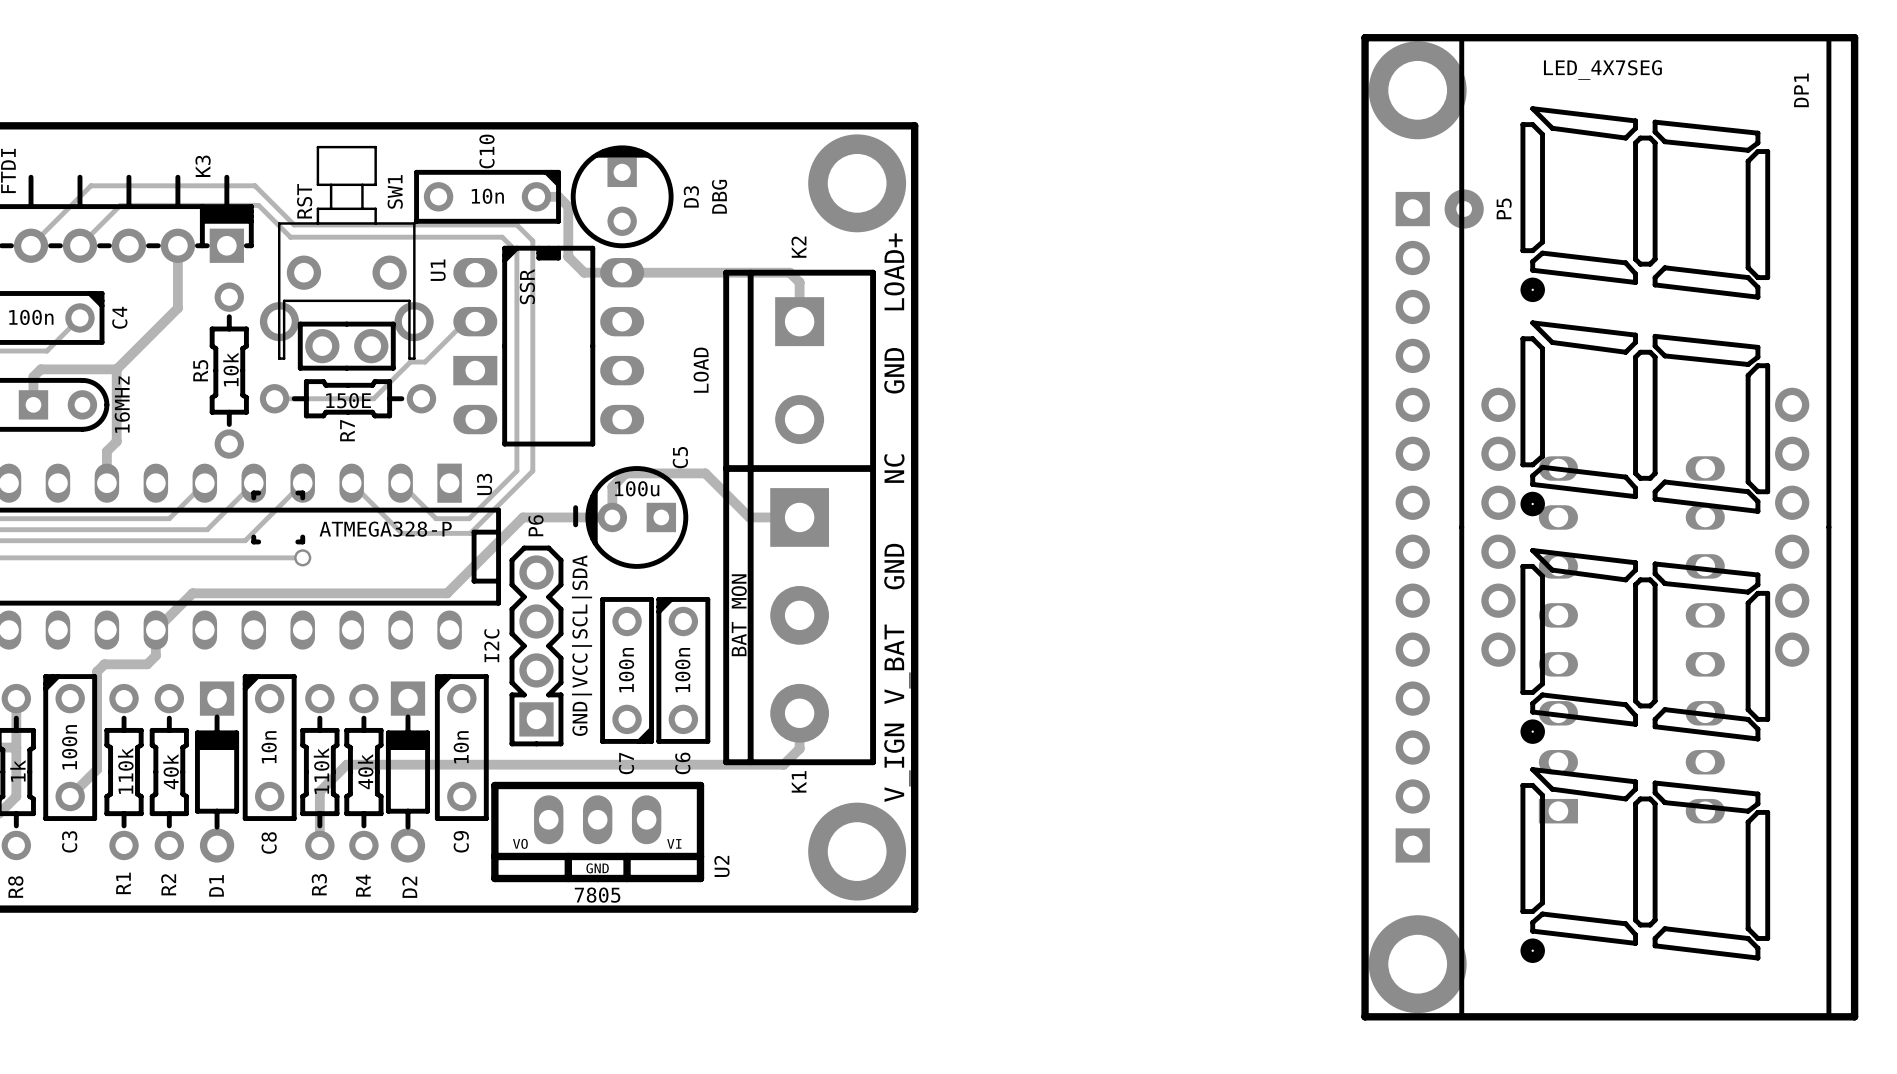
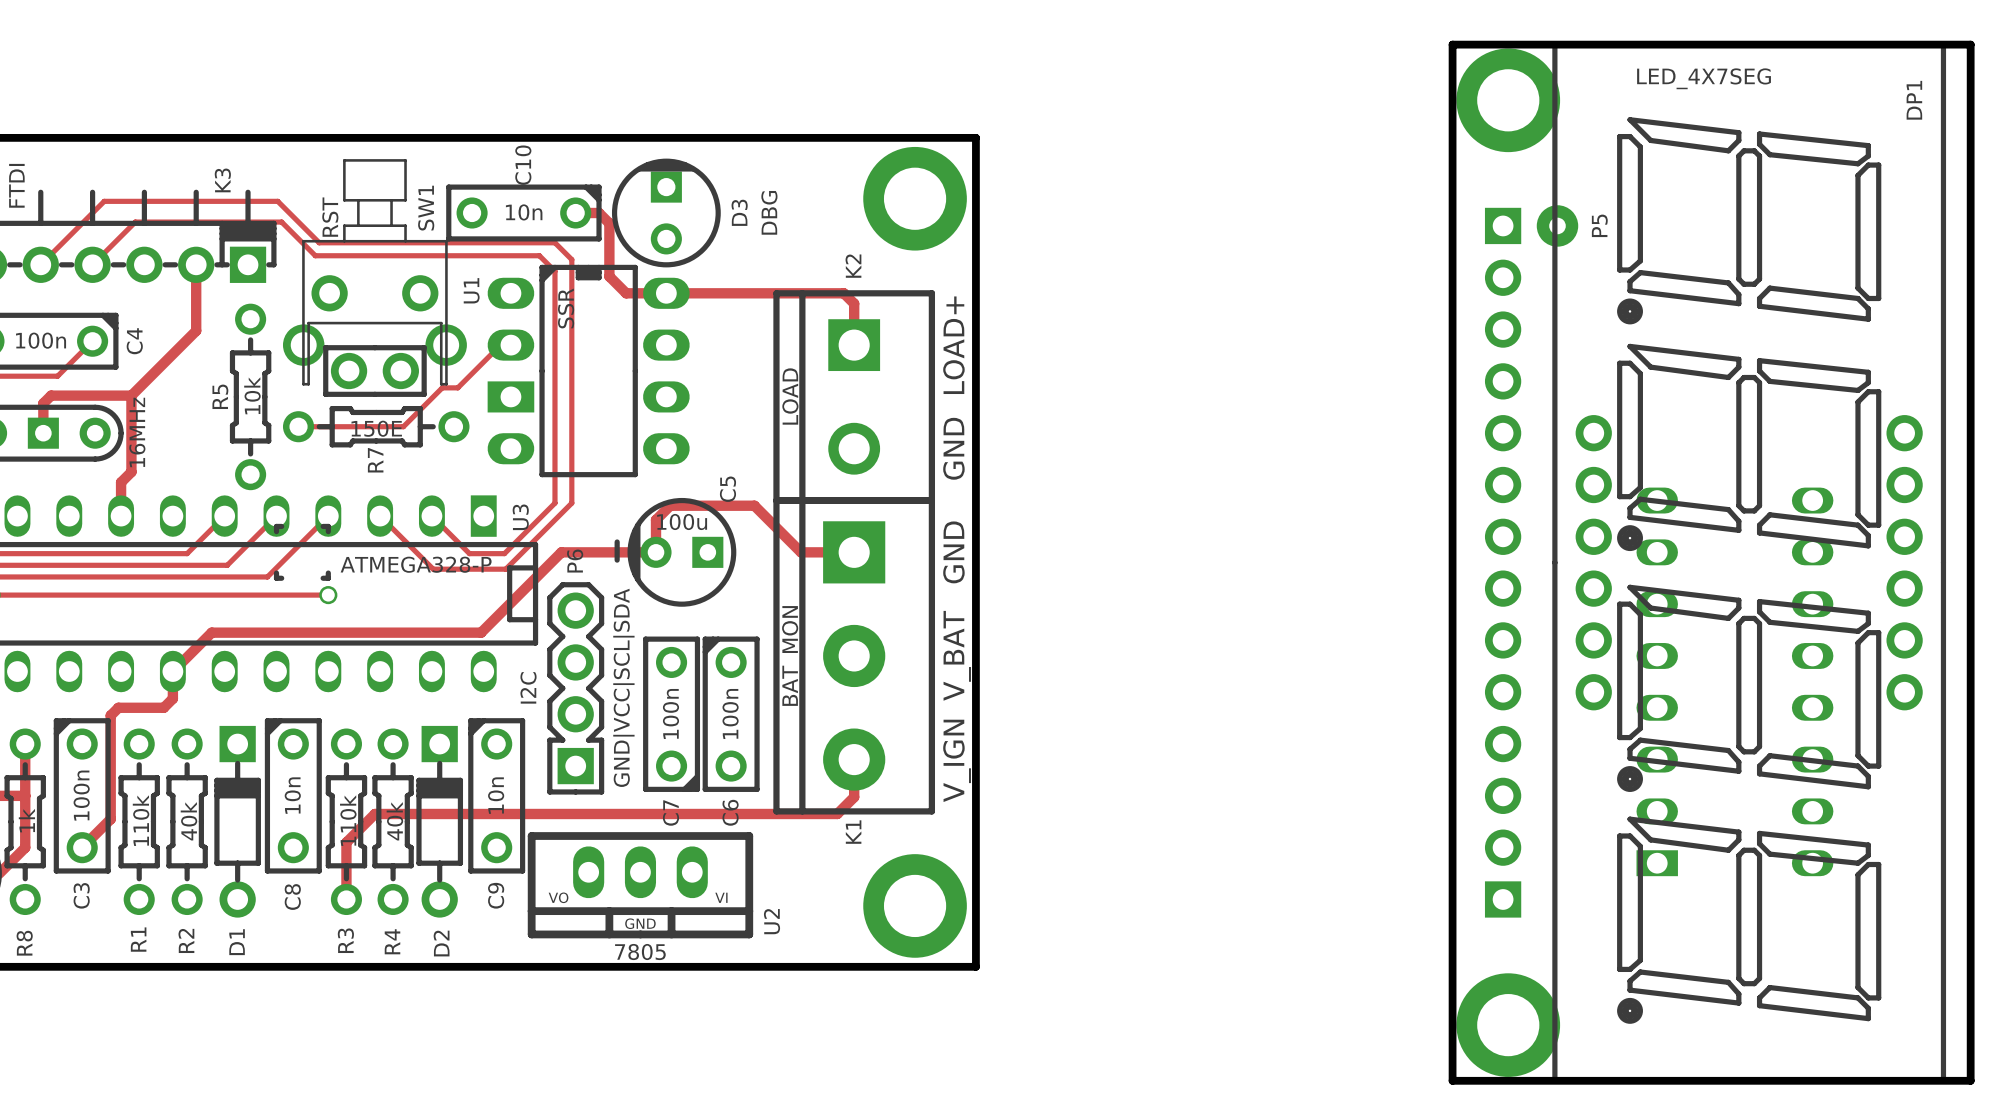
text position: LOAD+ (894, 271) -> LOAD+ (953, 345)
K2 value position: LOAD (701, 370) -> LOAD (790, 396)
text position: GND (894, 370) -> GND (953, 448)
text: NC (894, 468) -> none
text position: GND (894, 566) -> GND (953, 552)
text position: V_BAT (897, 664) -> V_BAT (957, 655)
text position: V_IGN (897, 762) -> V_IGN (957, 760)

